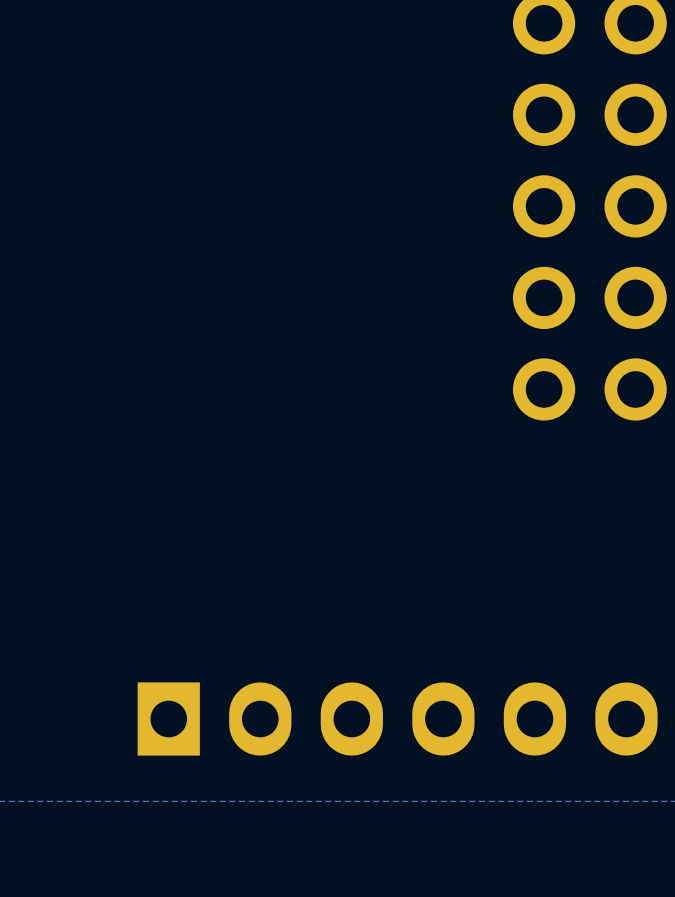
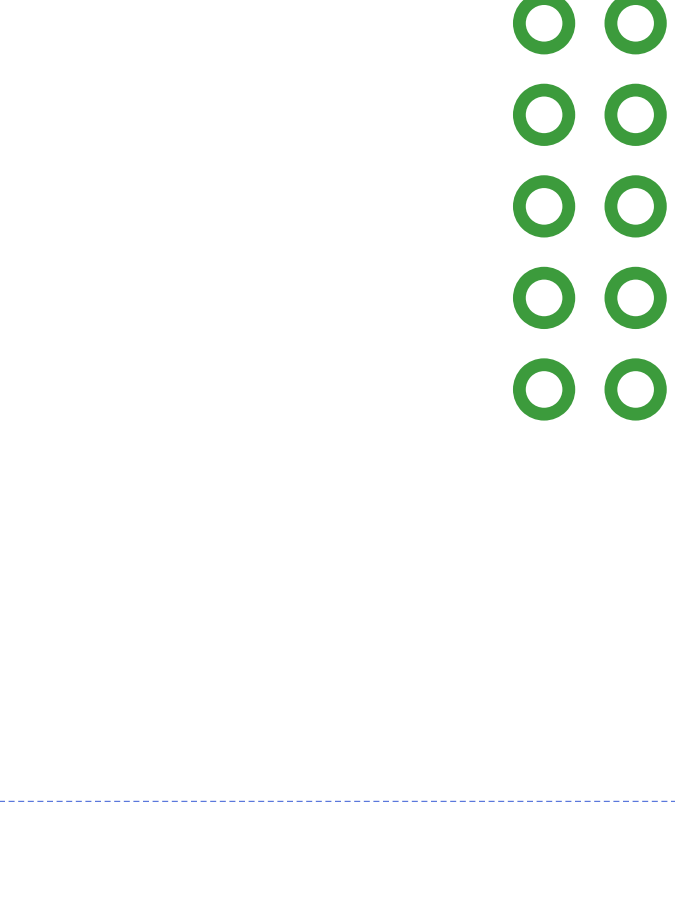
part: (397, 719) -> none

